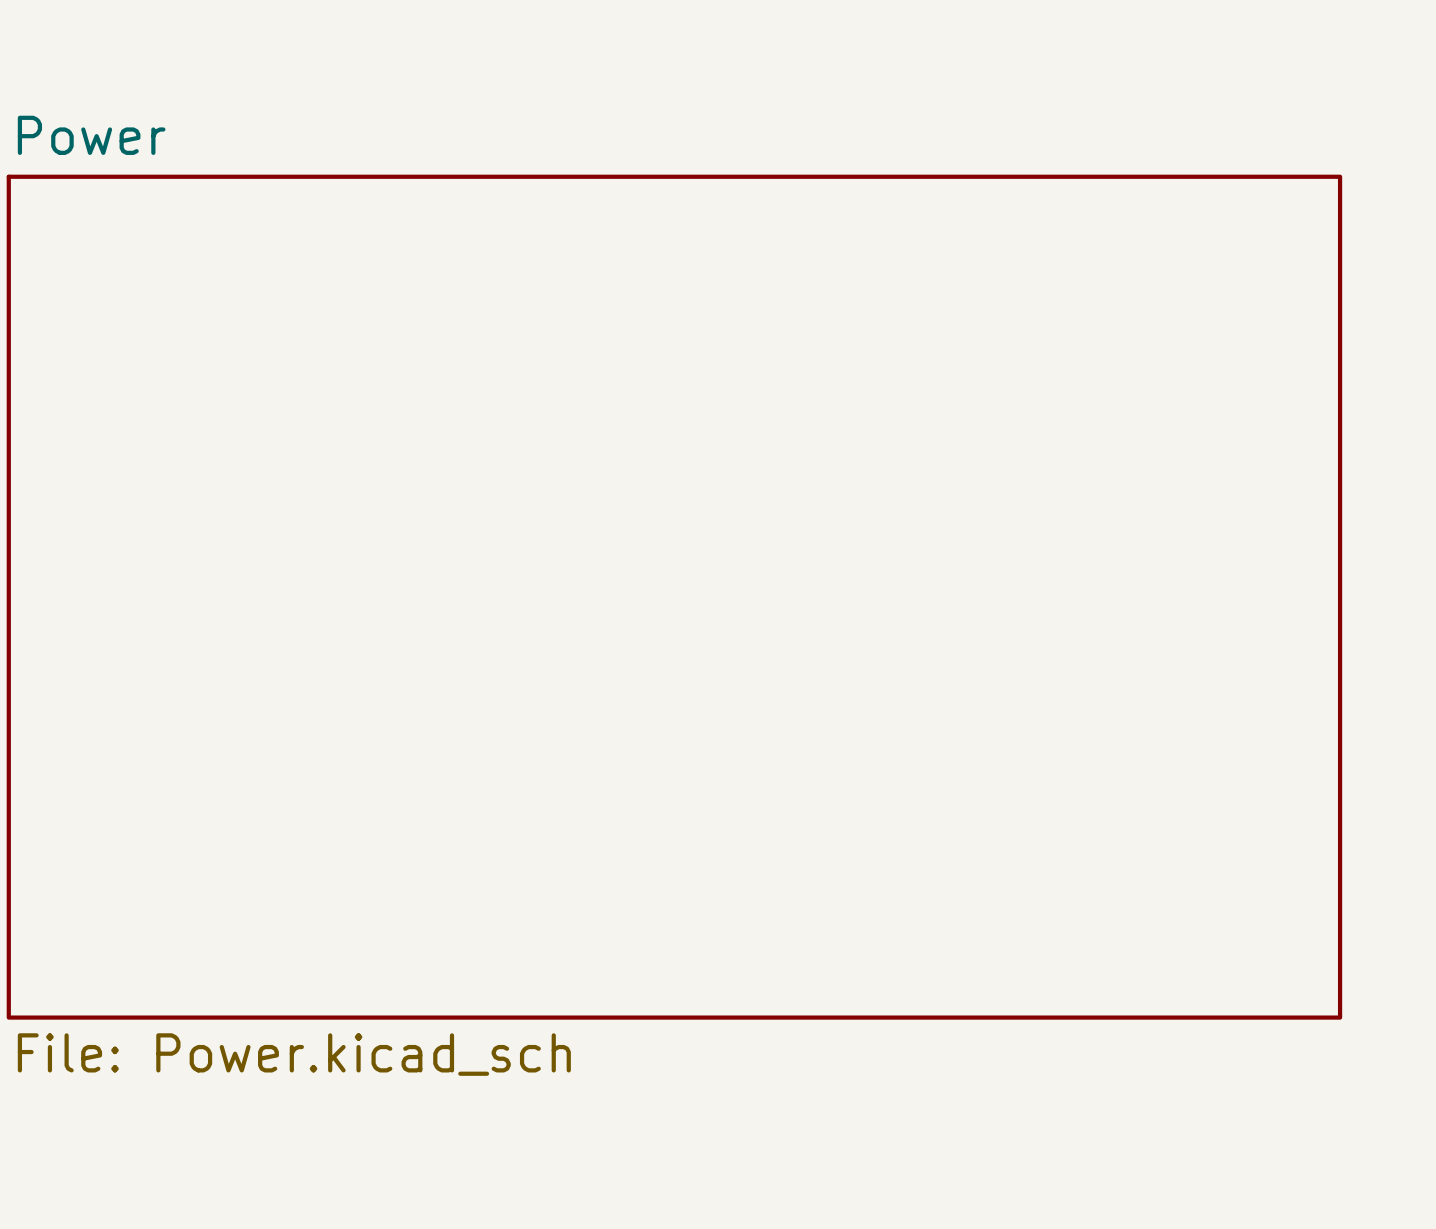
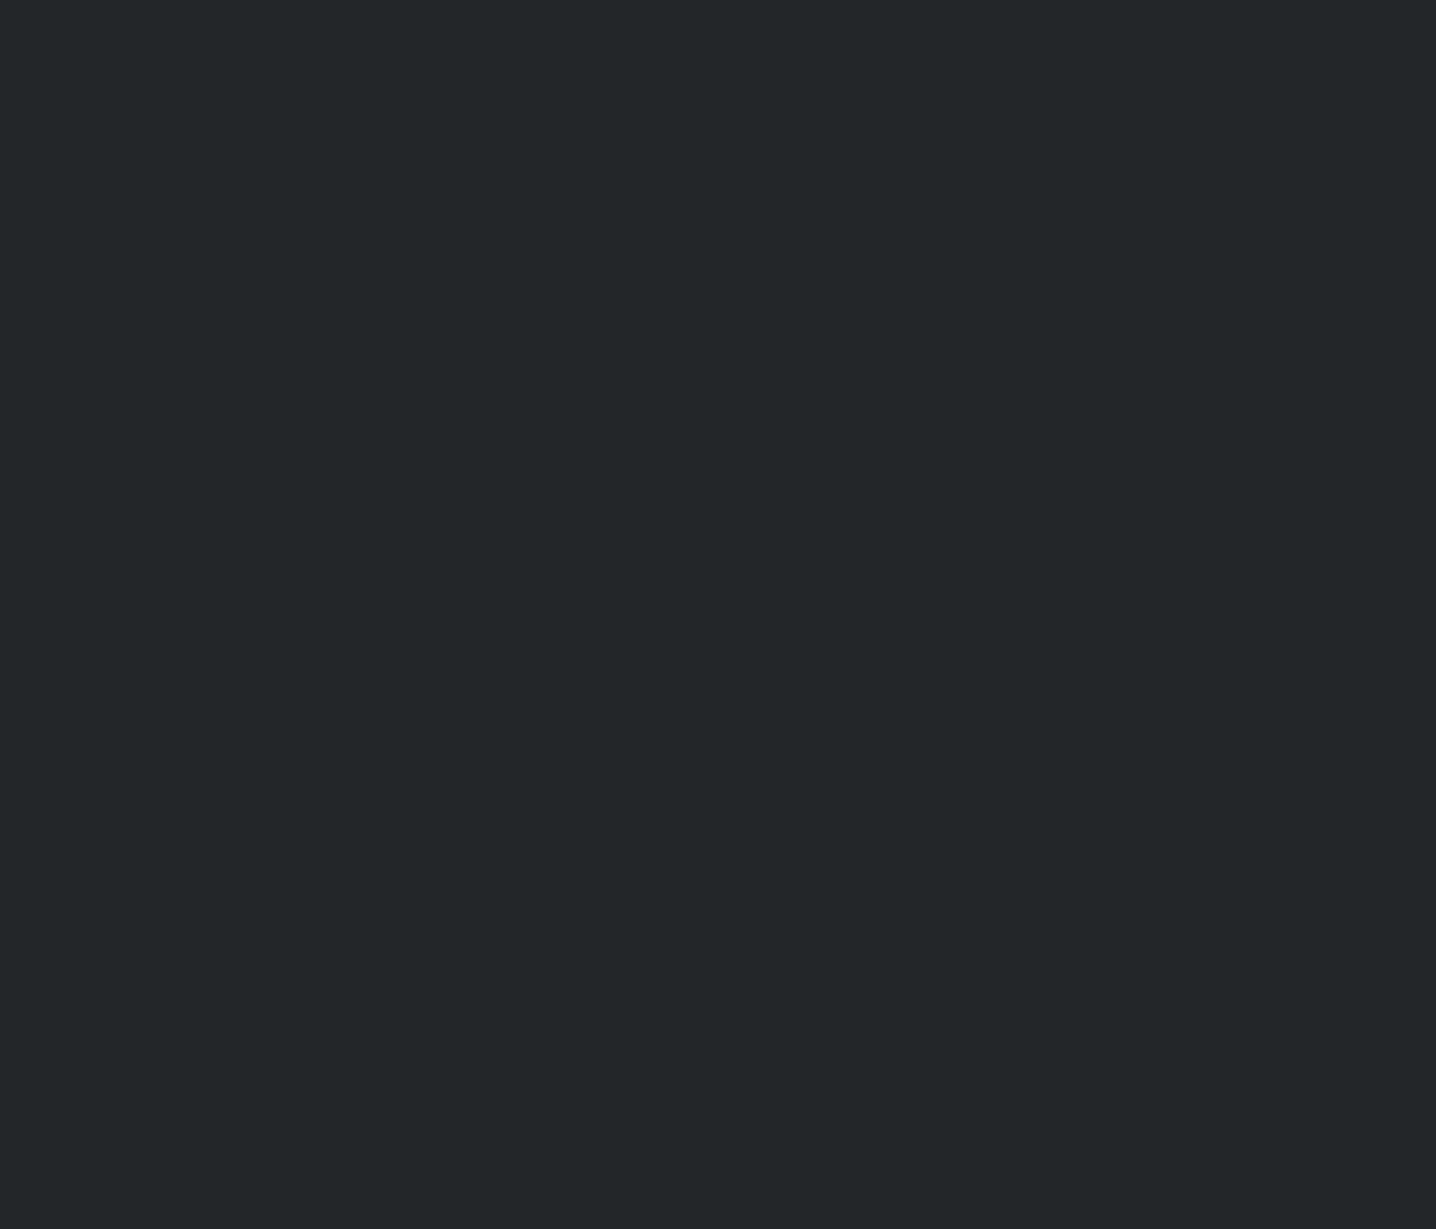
sheet Power: File: Power.kicad_sch (674, 597) -> none

